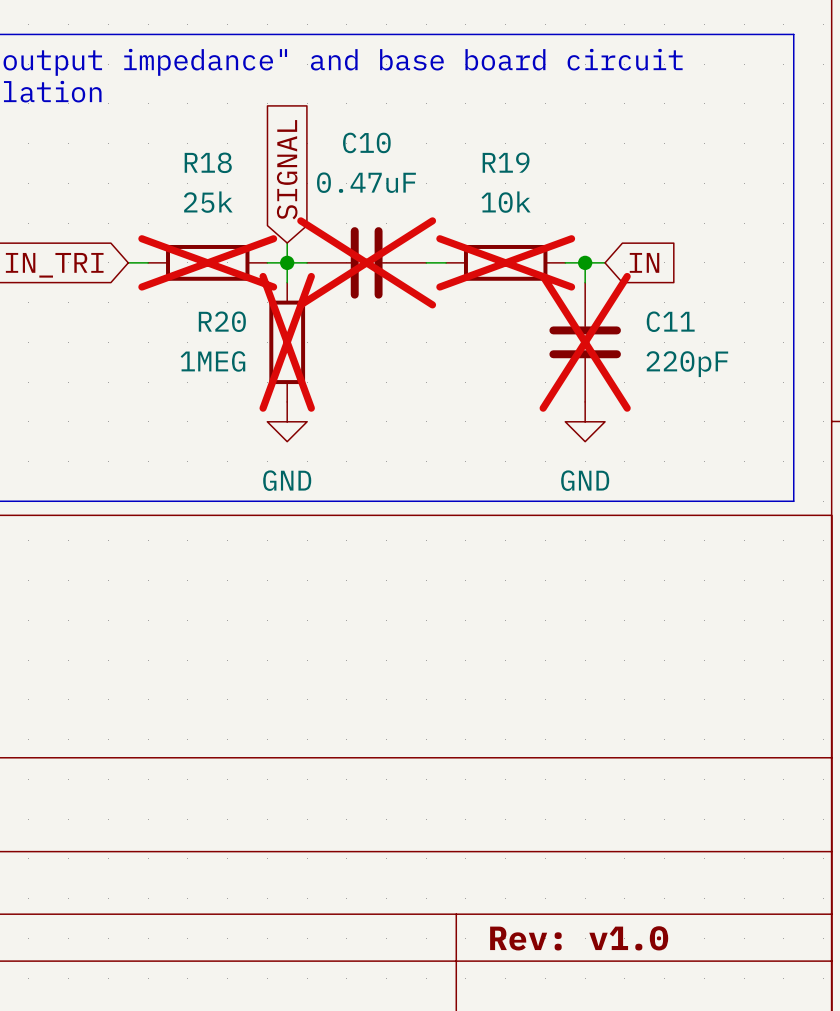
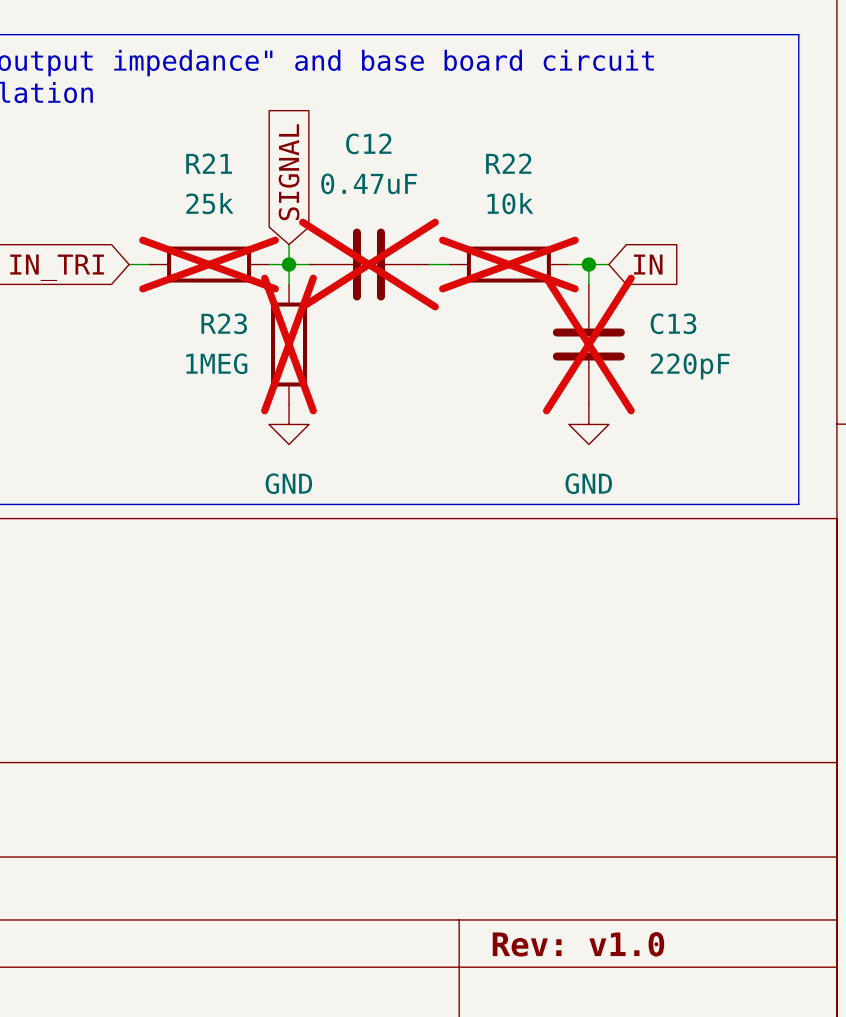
C10 name: C10 (366, 142) -> C12 (368, 143)
R18 name: R18 (208, 162) -> R21 (209, 163)
R19 name: R19 (506, 162) -> R22 (508, 163)
R20 name: R20 (222, 321) -> R23 (224, 323)
C11 name: C11 (670, 321) -> C13 (673, 323)

